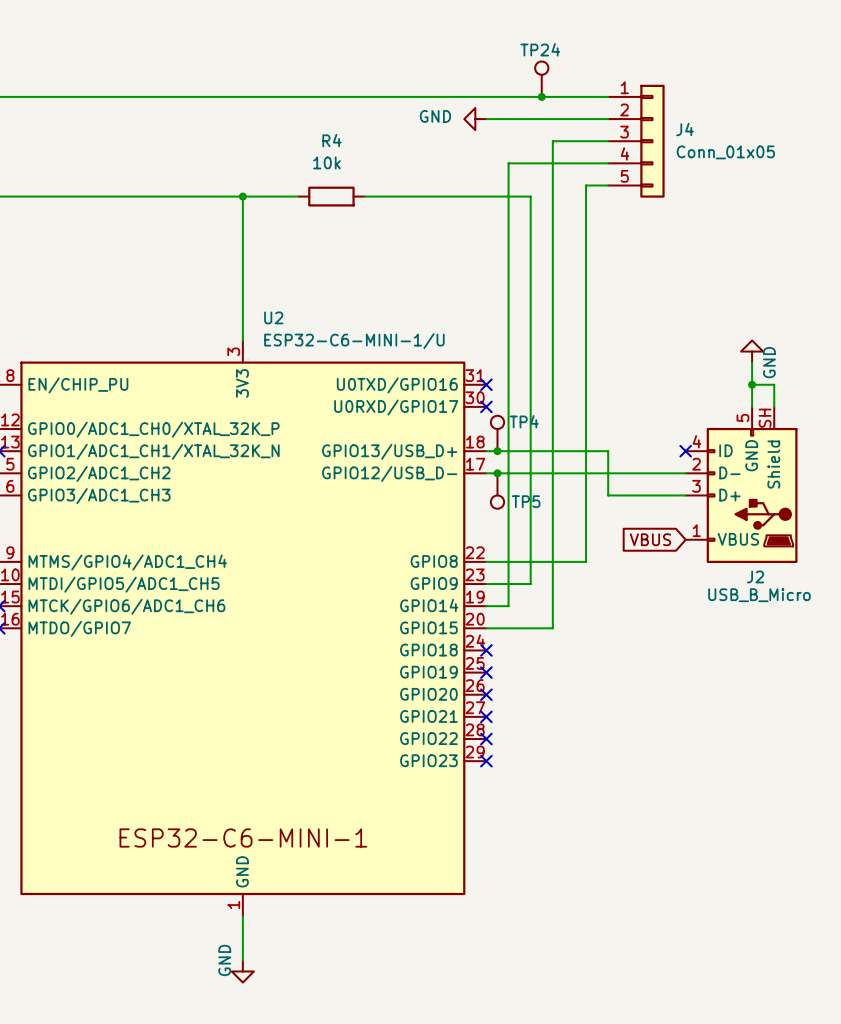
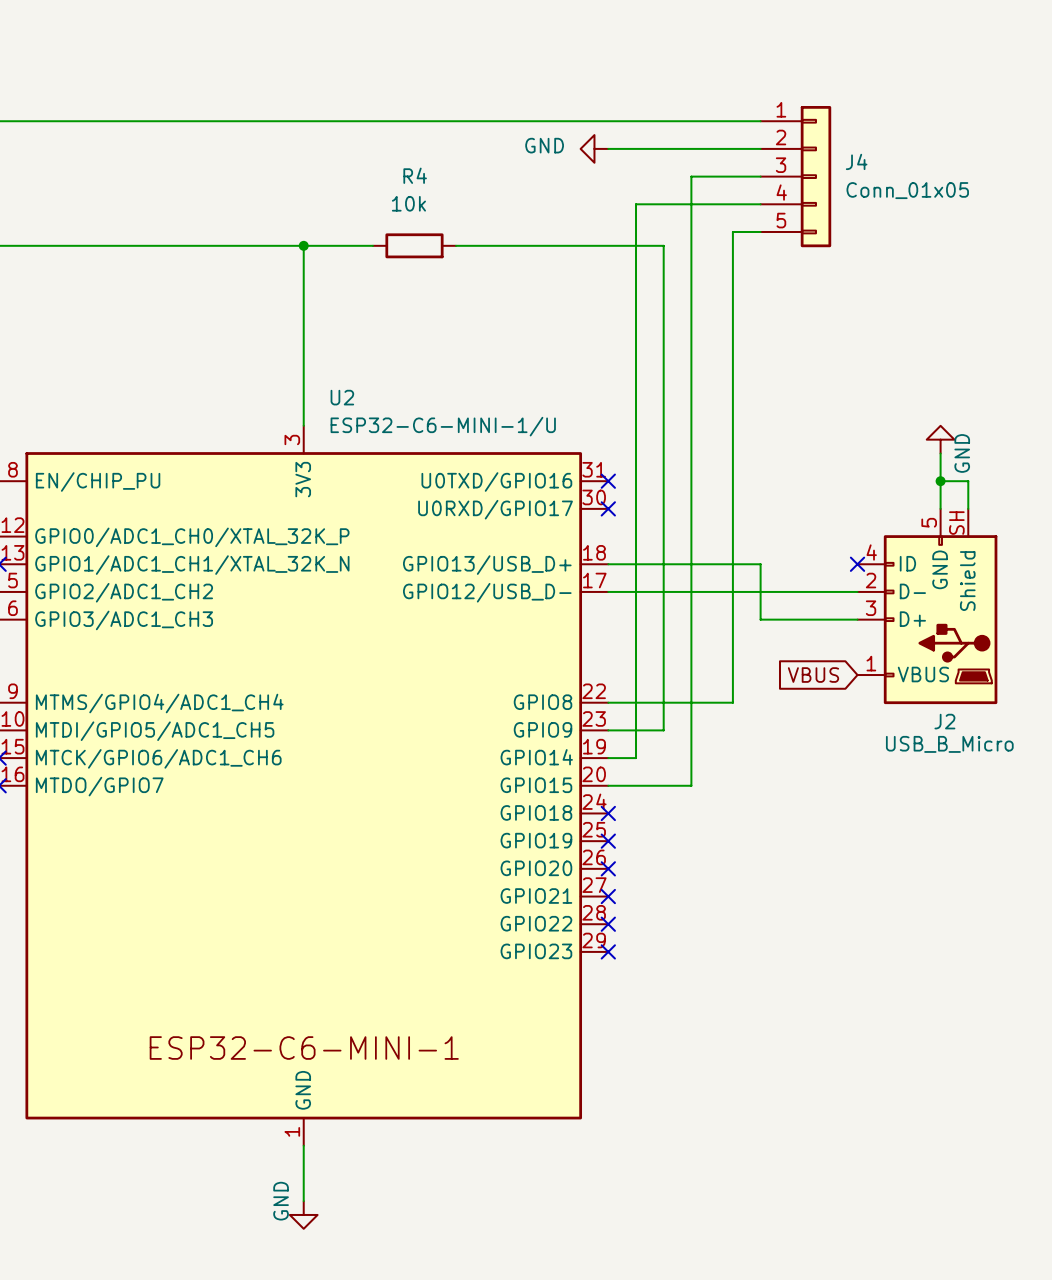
TP24: (541, 79) -> none
junction: (541, 96) -> none
TP4: (497, 433) -> none
junction: (497, 451) -> none
junction: (497, 473) -> none
TP5: (497, 491) -> none

